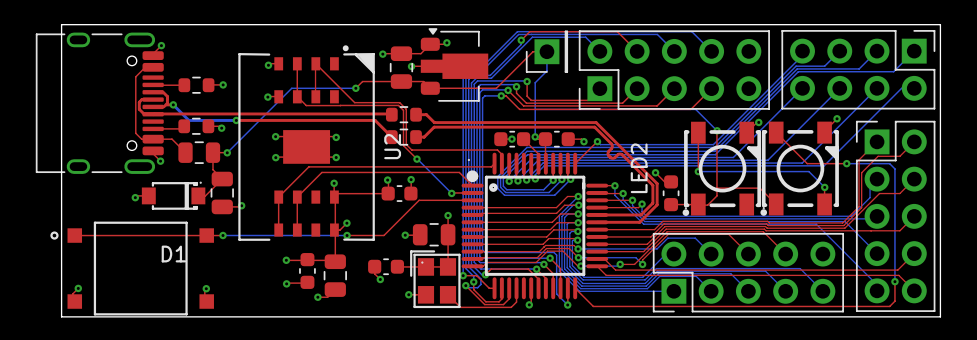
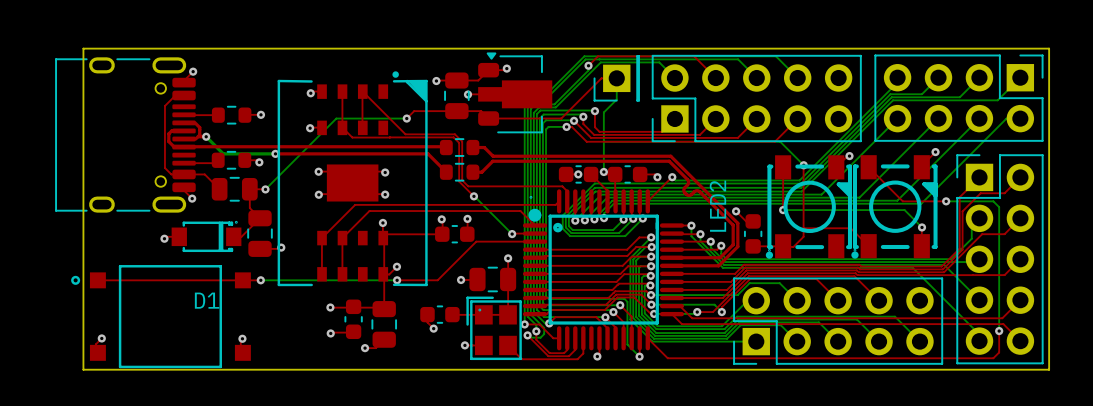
U2 name: U2 (392, 146) -> none

